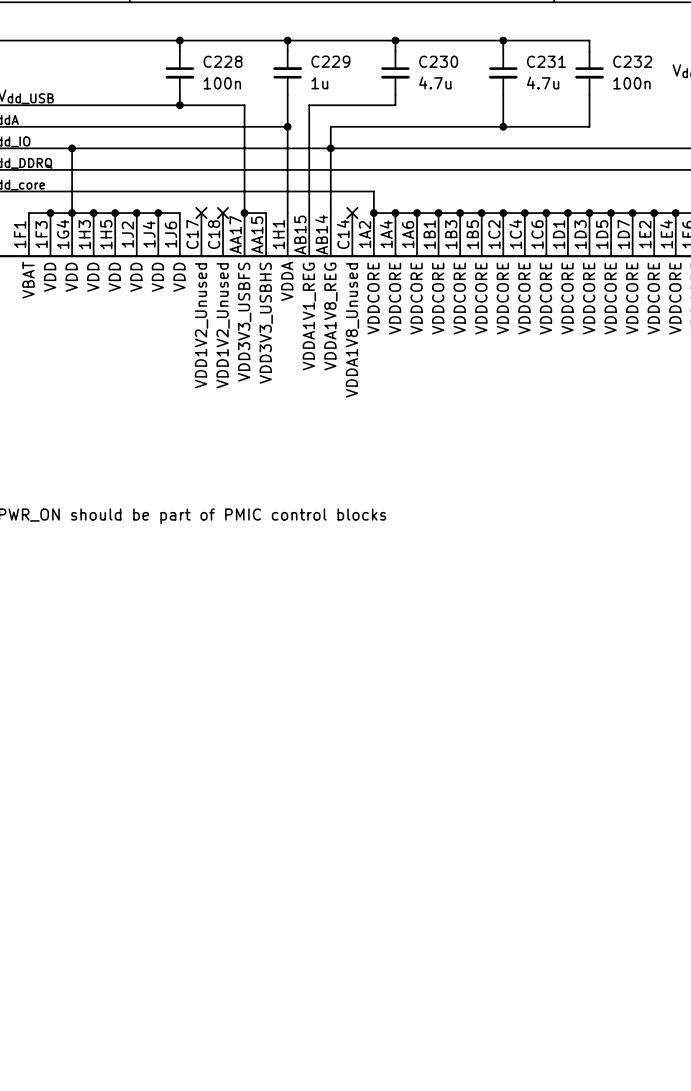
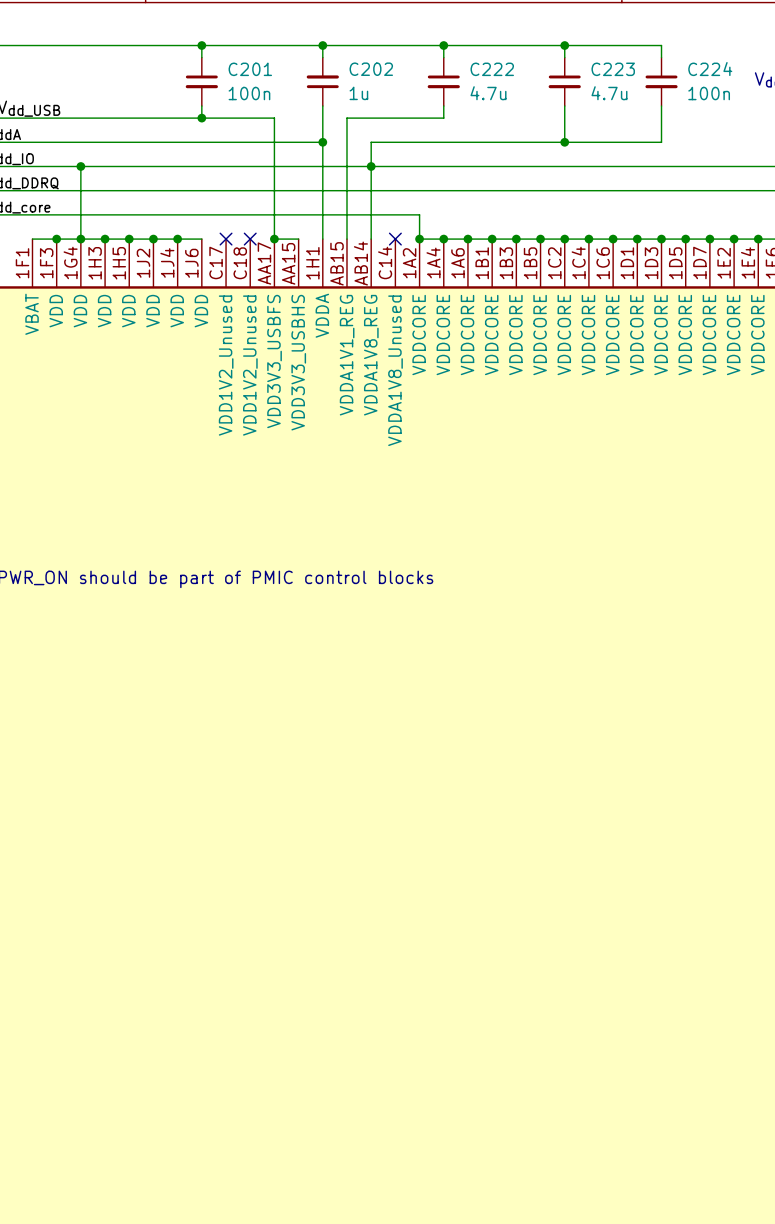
C228 name: C228 (223, 61) -> C201 (250, 69)
C229 name: C229 (330, 61) -> C202 (371, 69)
C230 name: C230 (438, 61) -> C222 (492, 69)
C231 name: C231 (546, 61) -> C223 (613, 69)
C232 name: C232 (632, 61) -> C224 (710, 69)

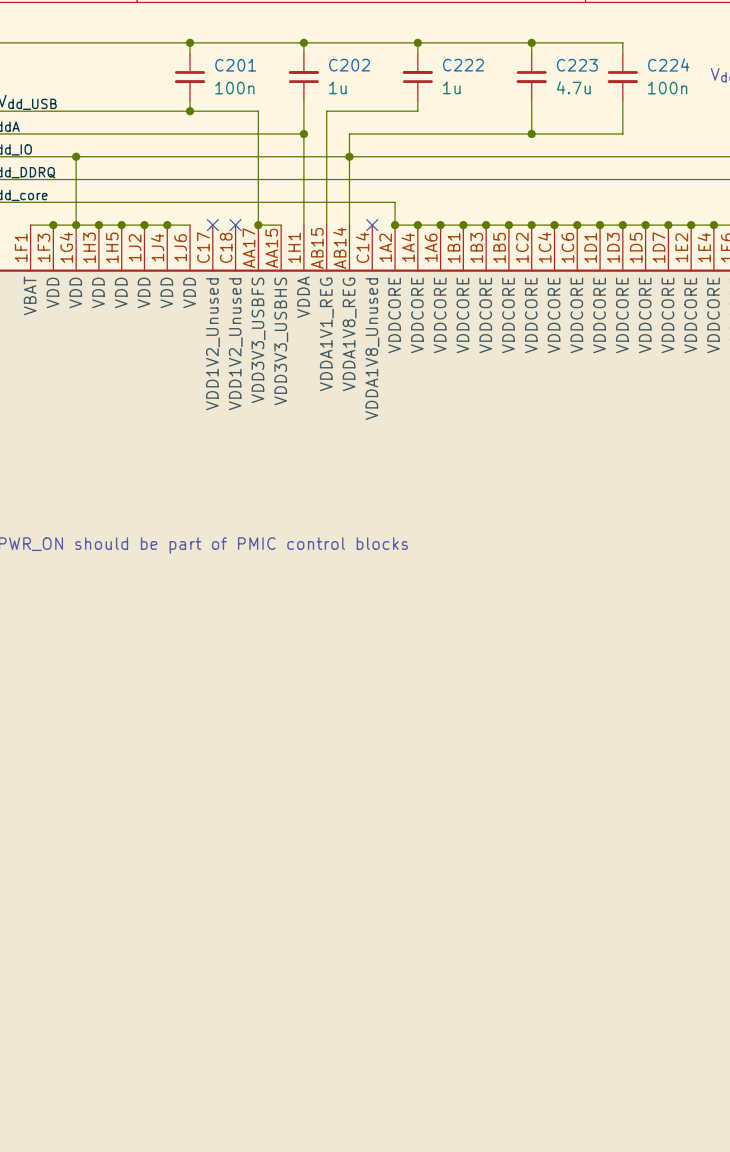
C222 rotation: 0° (443, 81) -> 180° (417, 76)
C222 value: 4.7u (488, 93) -> 1u (451, 87)

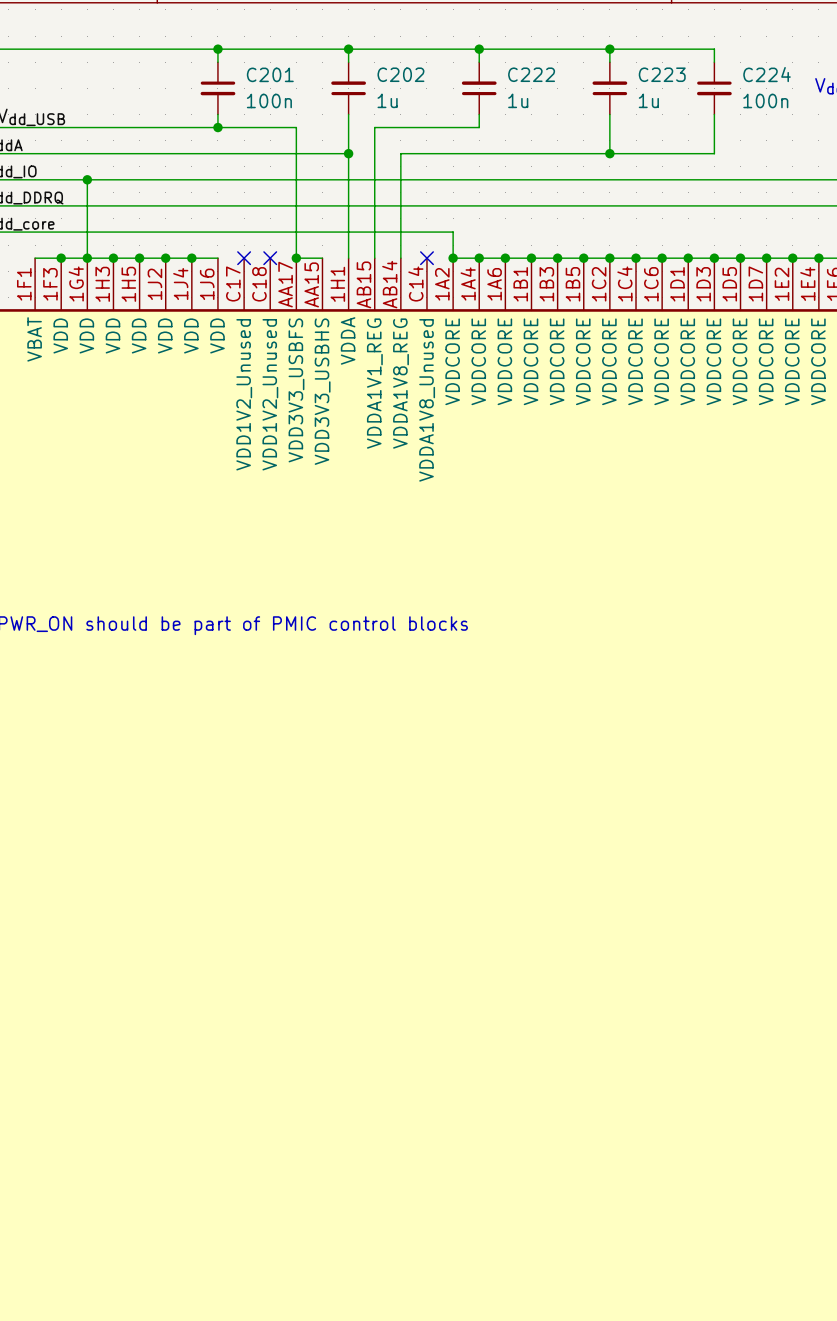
C223 rotation: 0° (531, 77) -> 180° (609, 88)
C223 value: 4.7u (573, 87) -> 1u (648, 100)
junction: (349, 156) -> none

